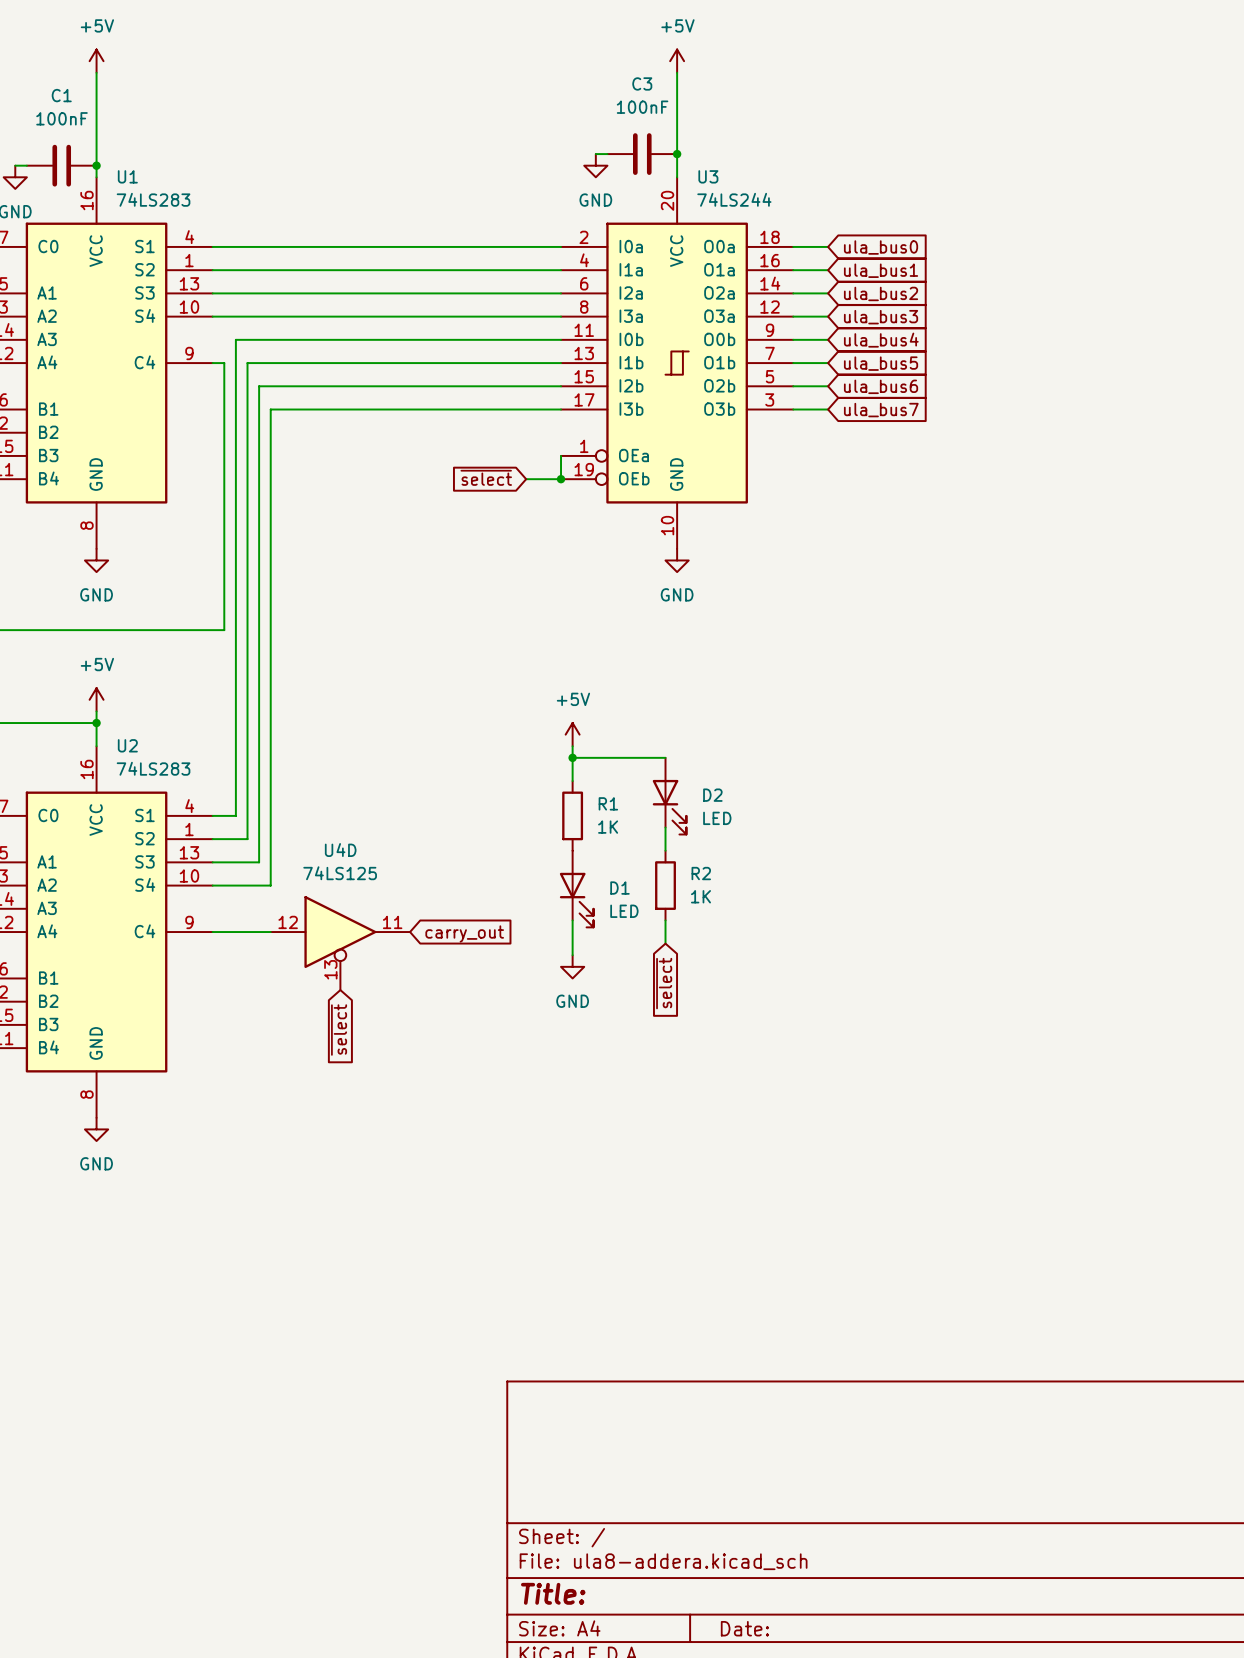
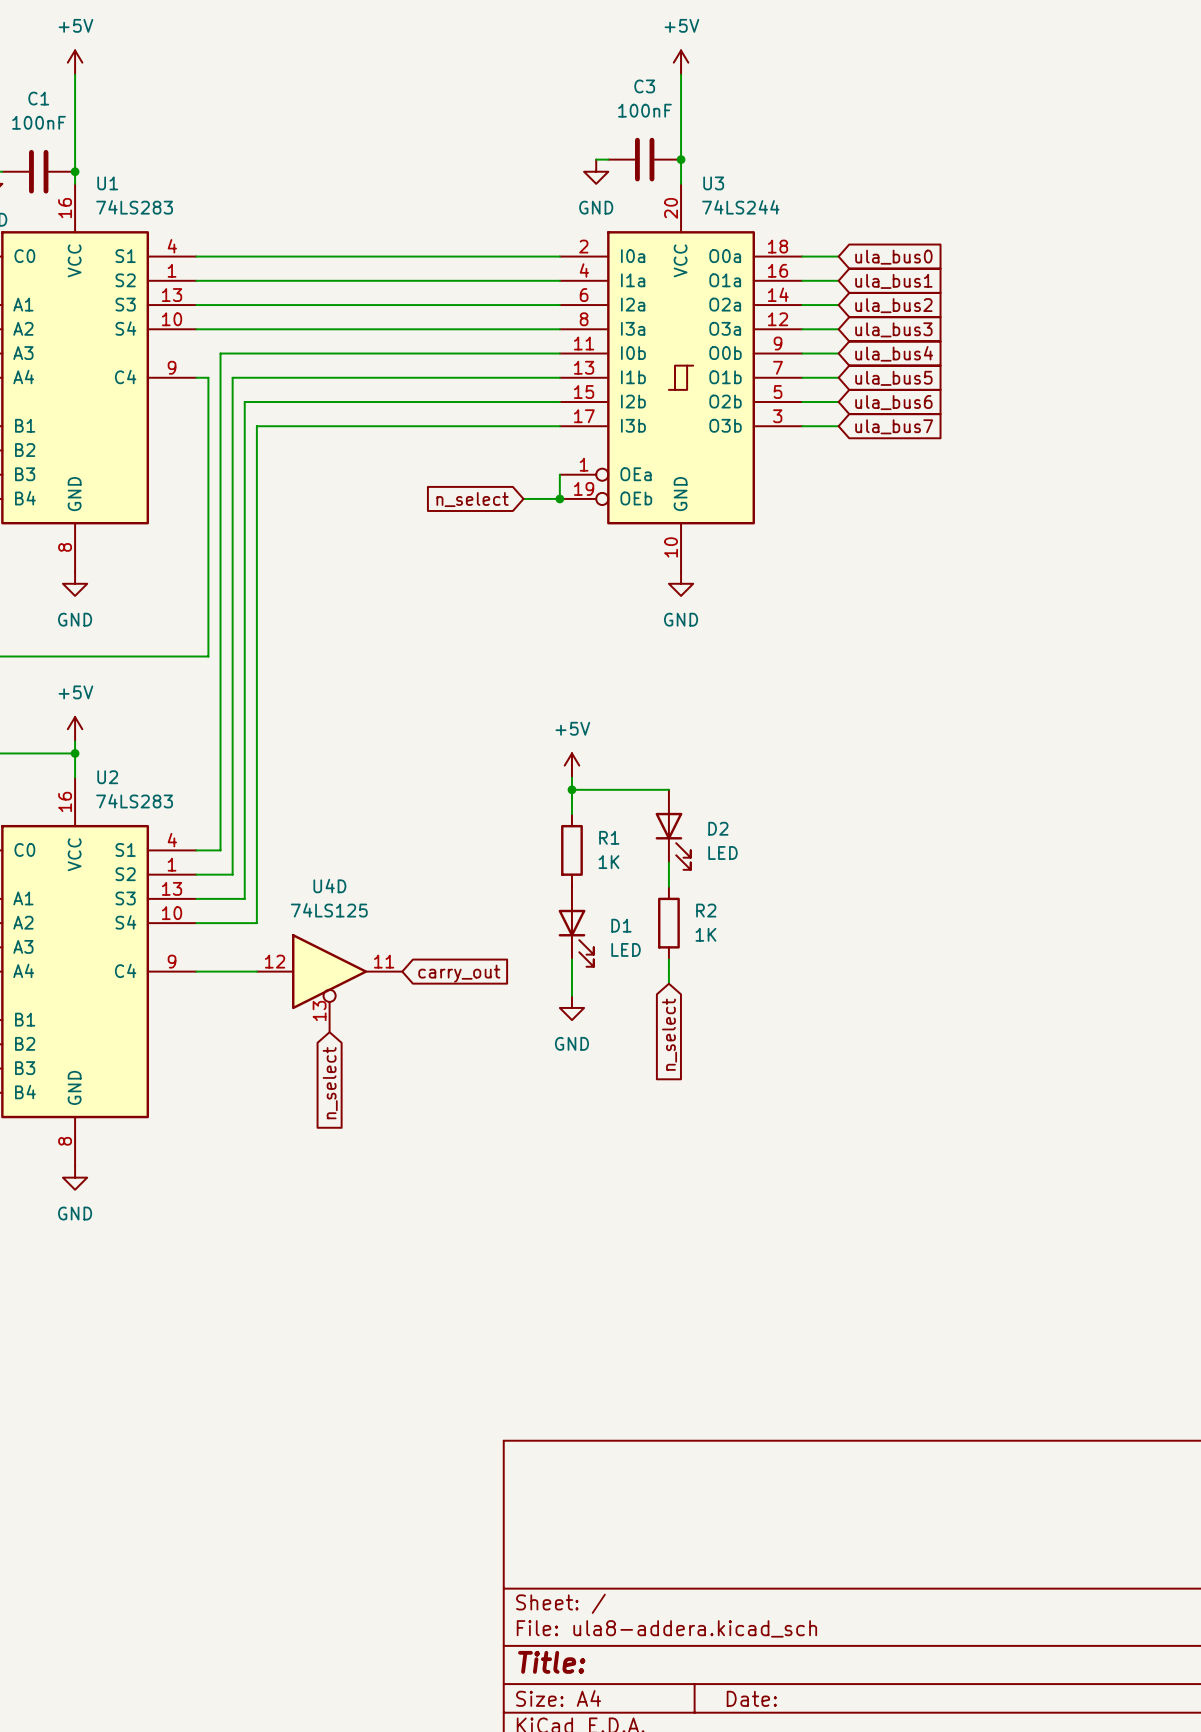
global label: ~{select} (486, 477) -> n_select (472, 499)
global label: ~{select} (664, 983) -> n_select (669, 1034)
global label: ~{select} (339, 1030) -> n_select (330, 1083)

